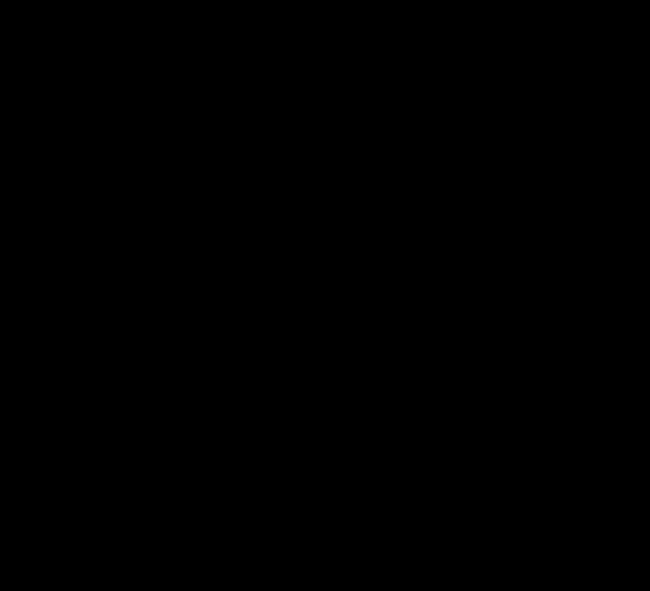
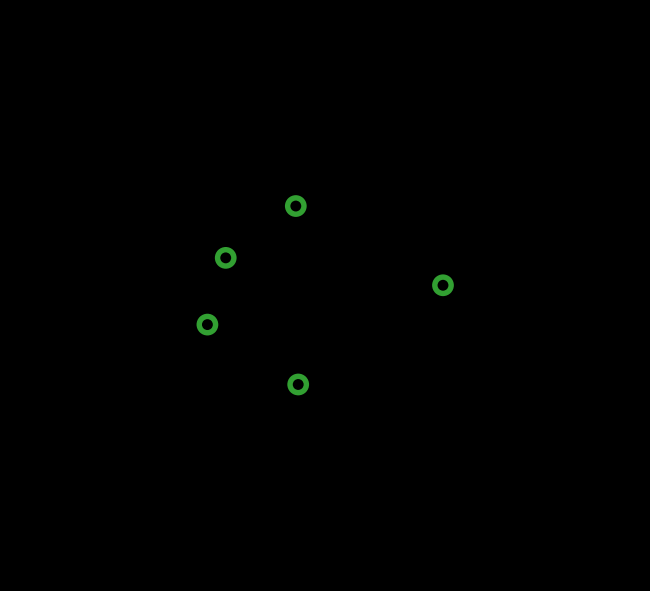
via: none -> (295, 206)
via: none -> (225, 257)
via: none -> (442, 285)
via: none -> (207, 324)
via: none -> (298, 384)

